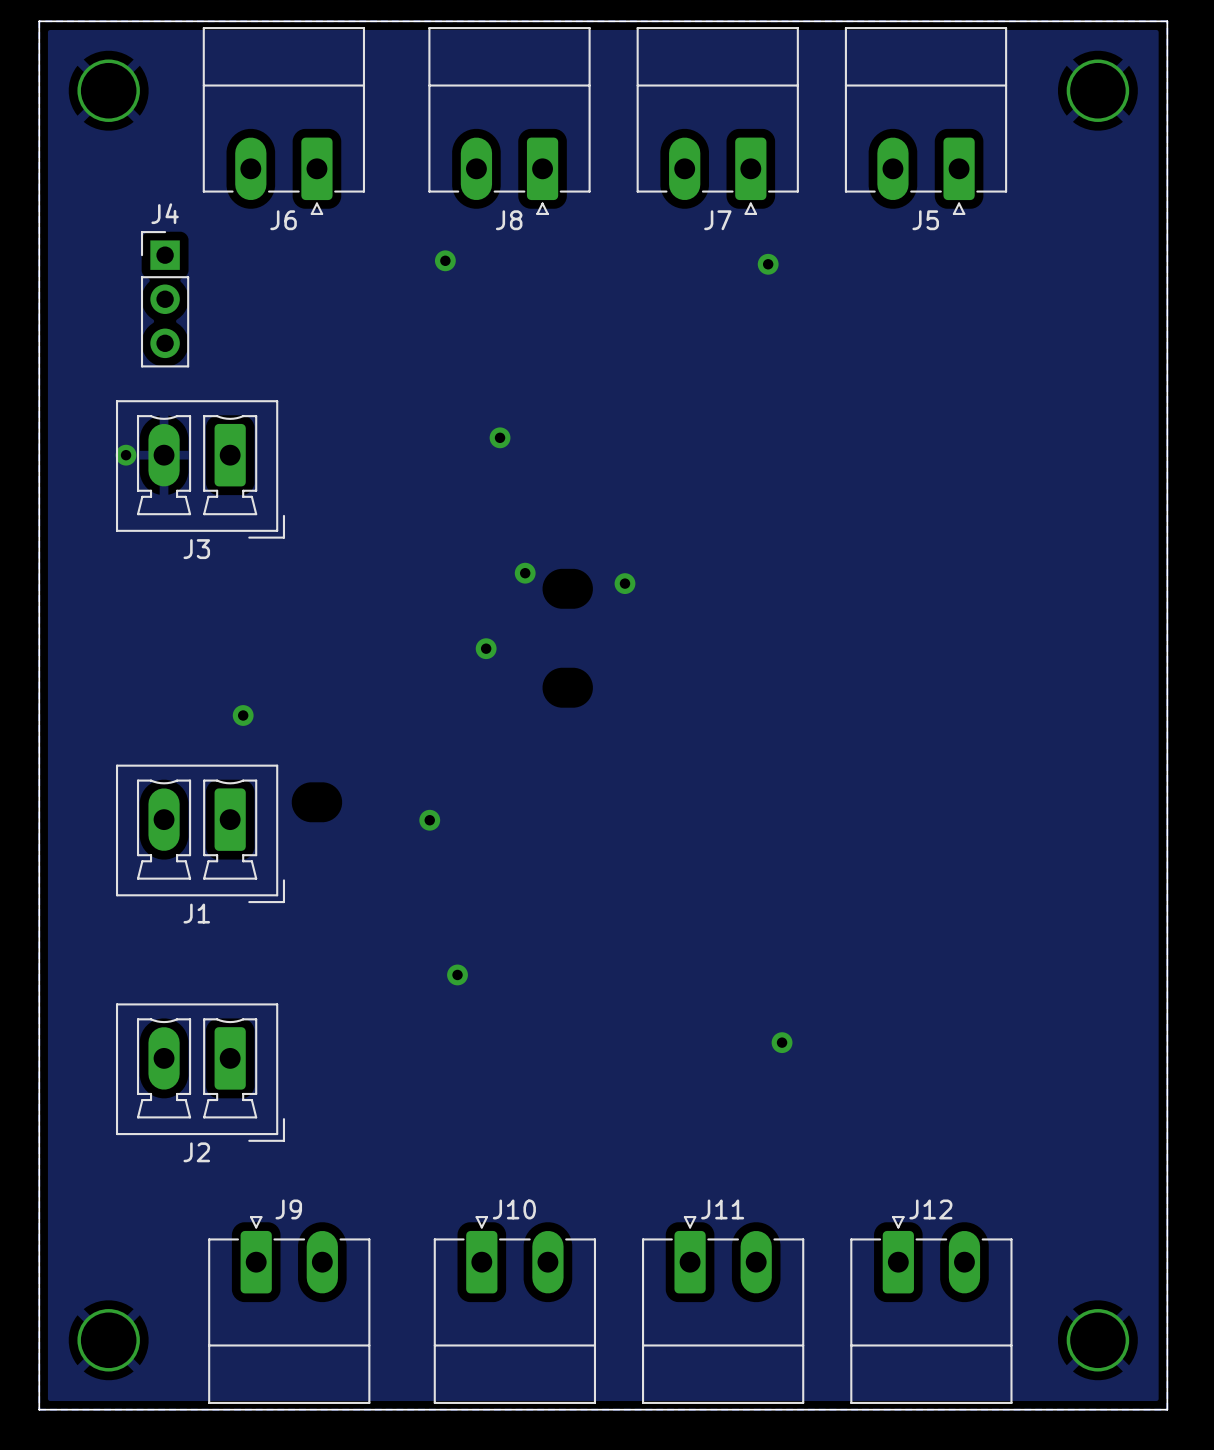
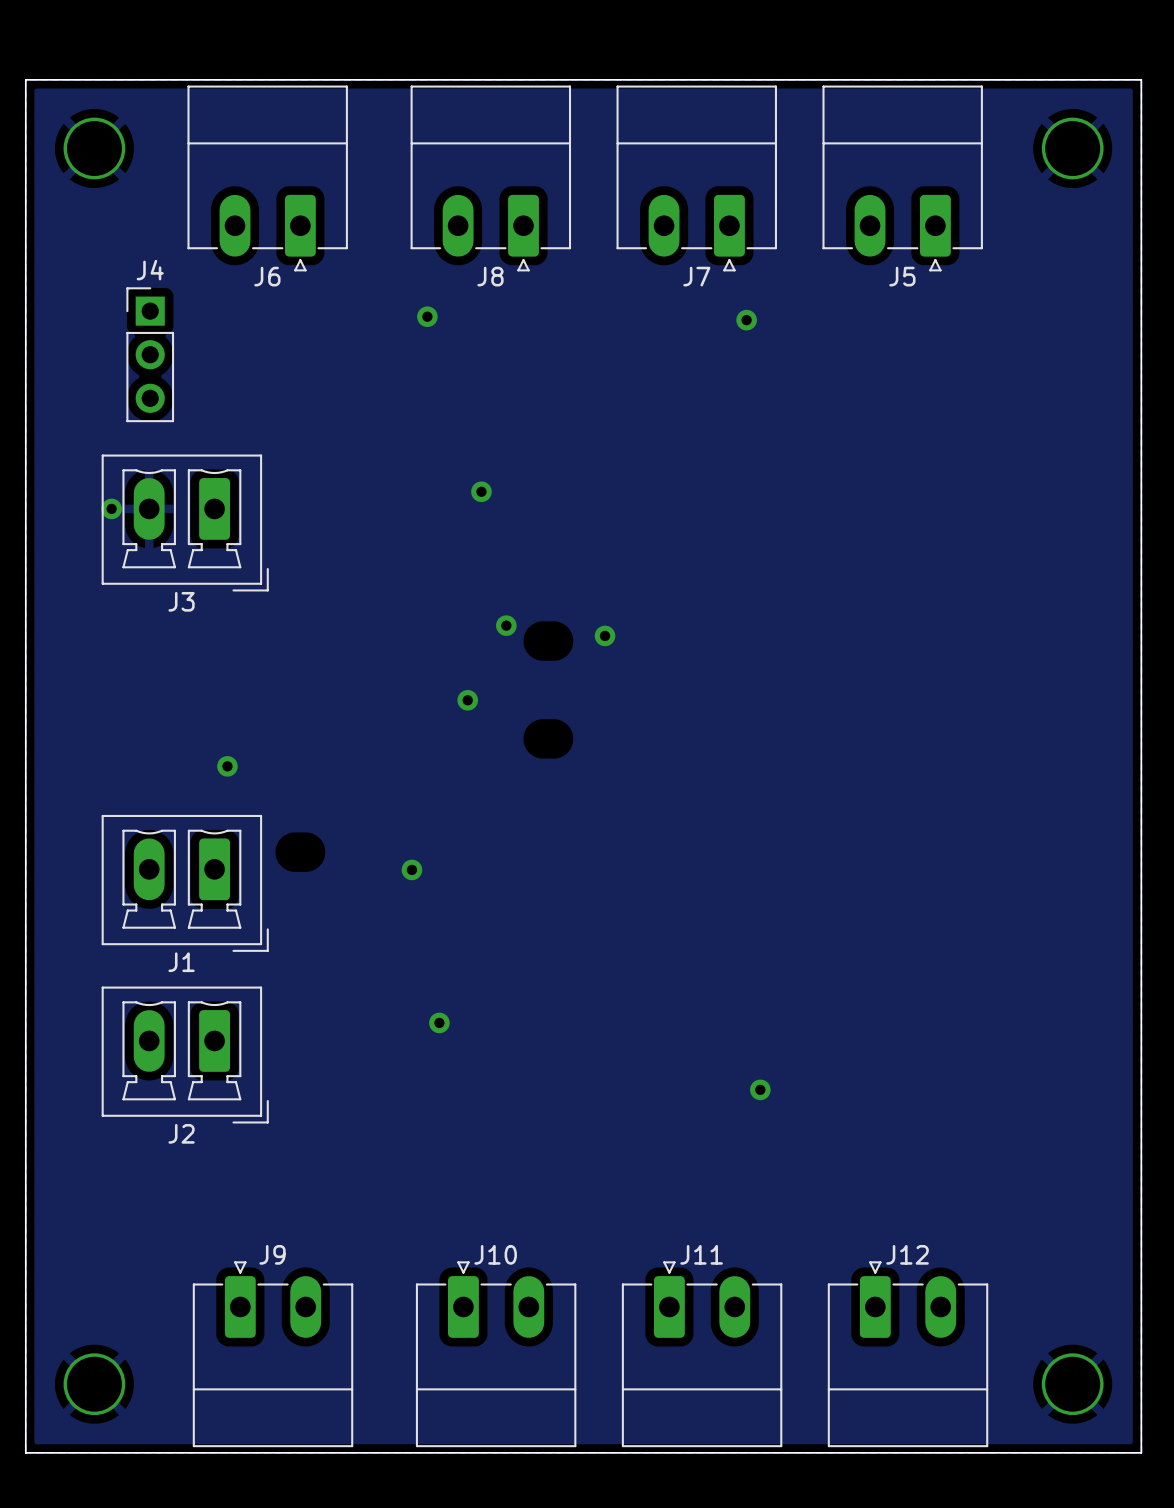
J2 position: (200, 1072) -> (185, 1055)

